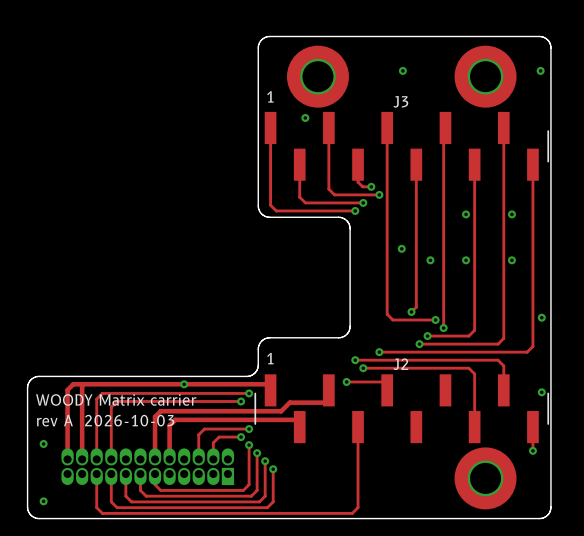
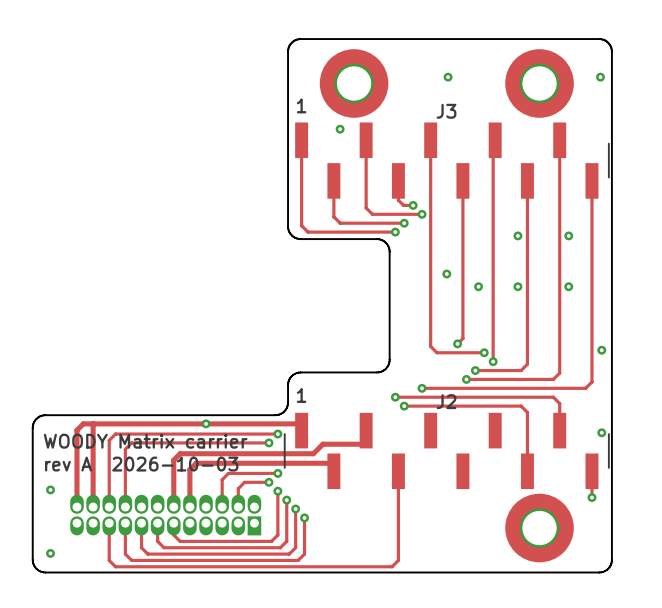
track: (346, 381) (387, 381) -> none
via: (346, 381) -> none

